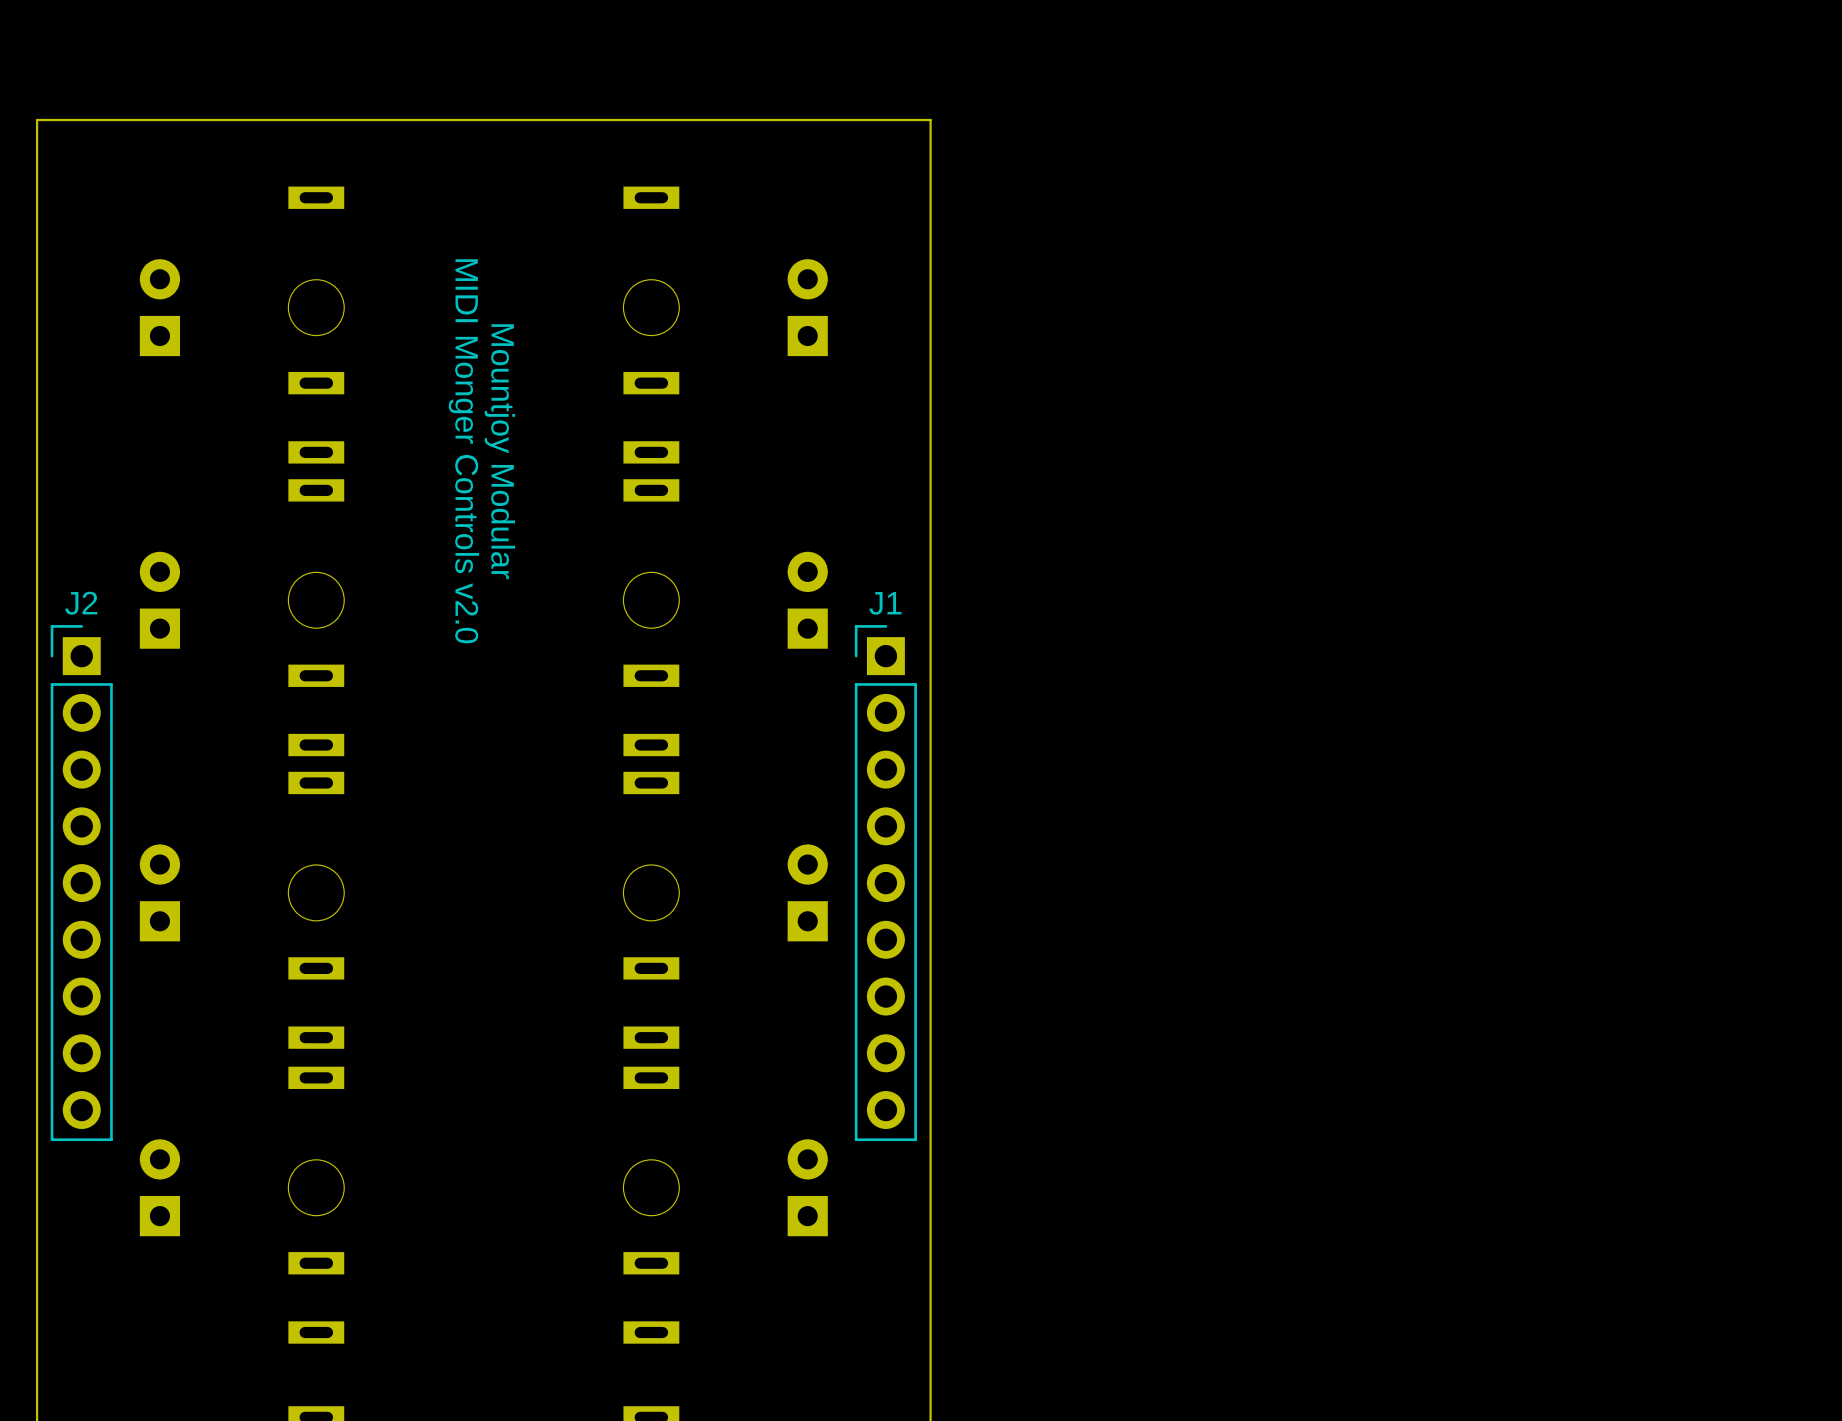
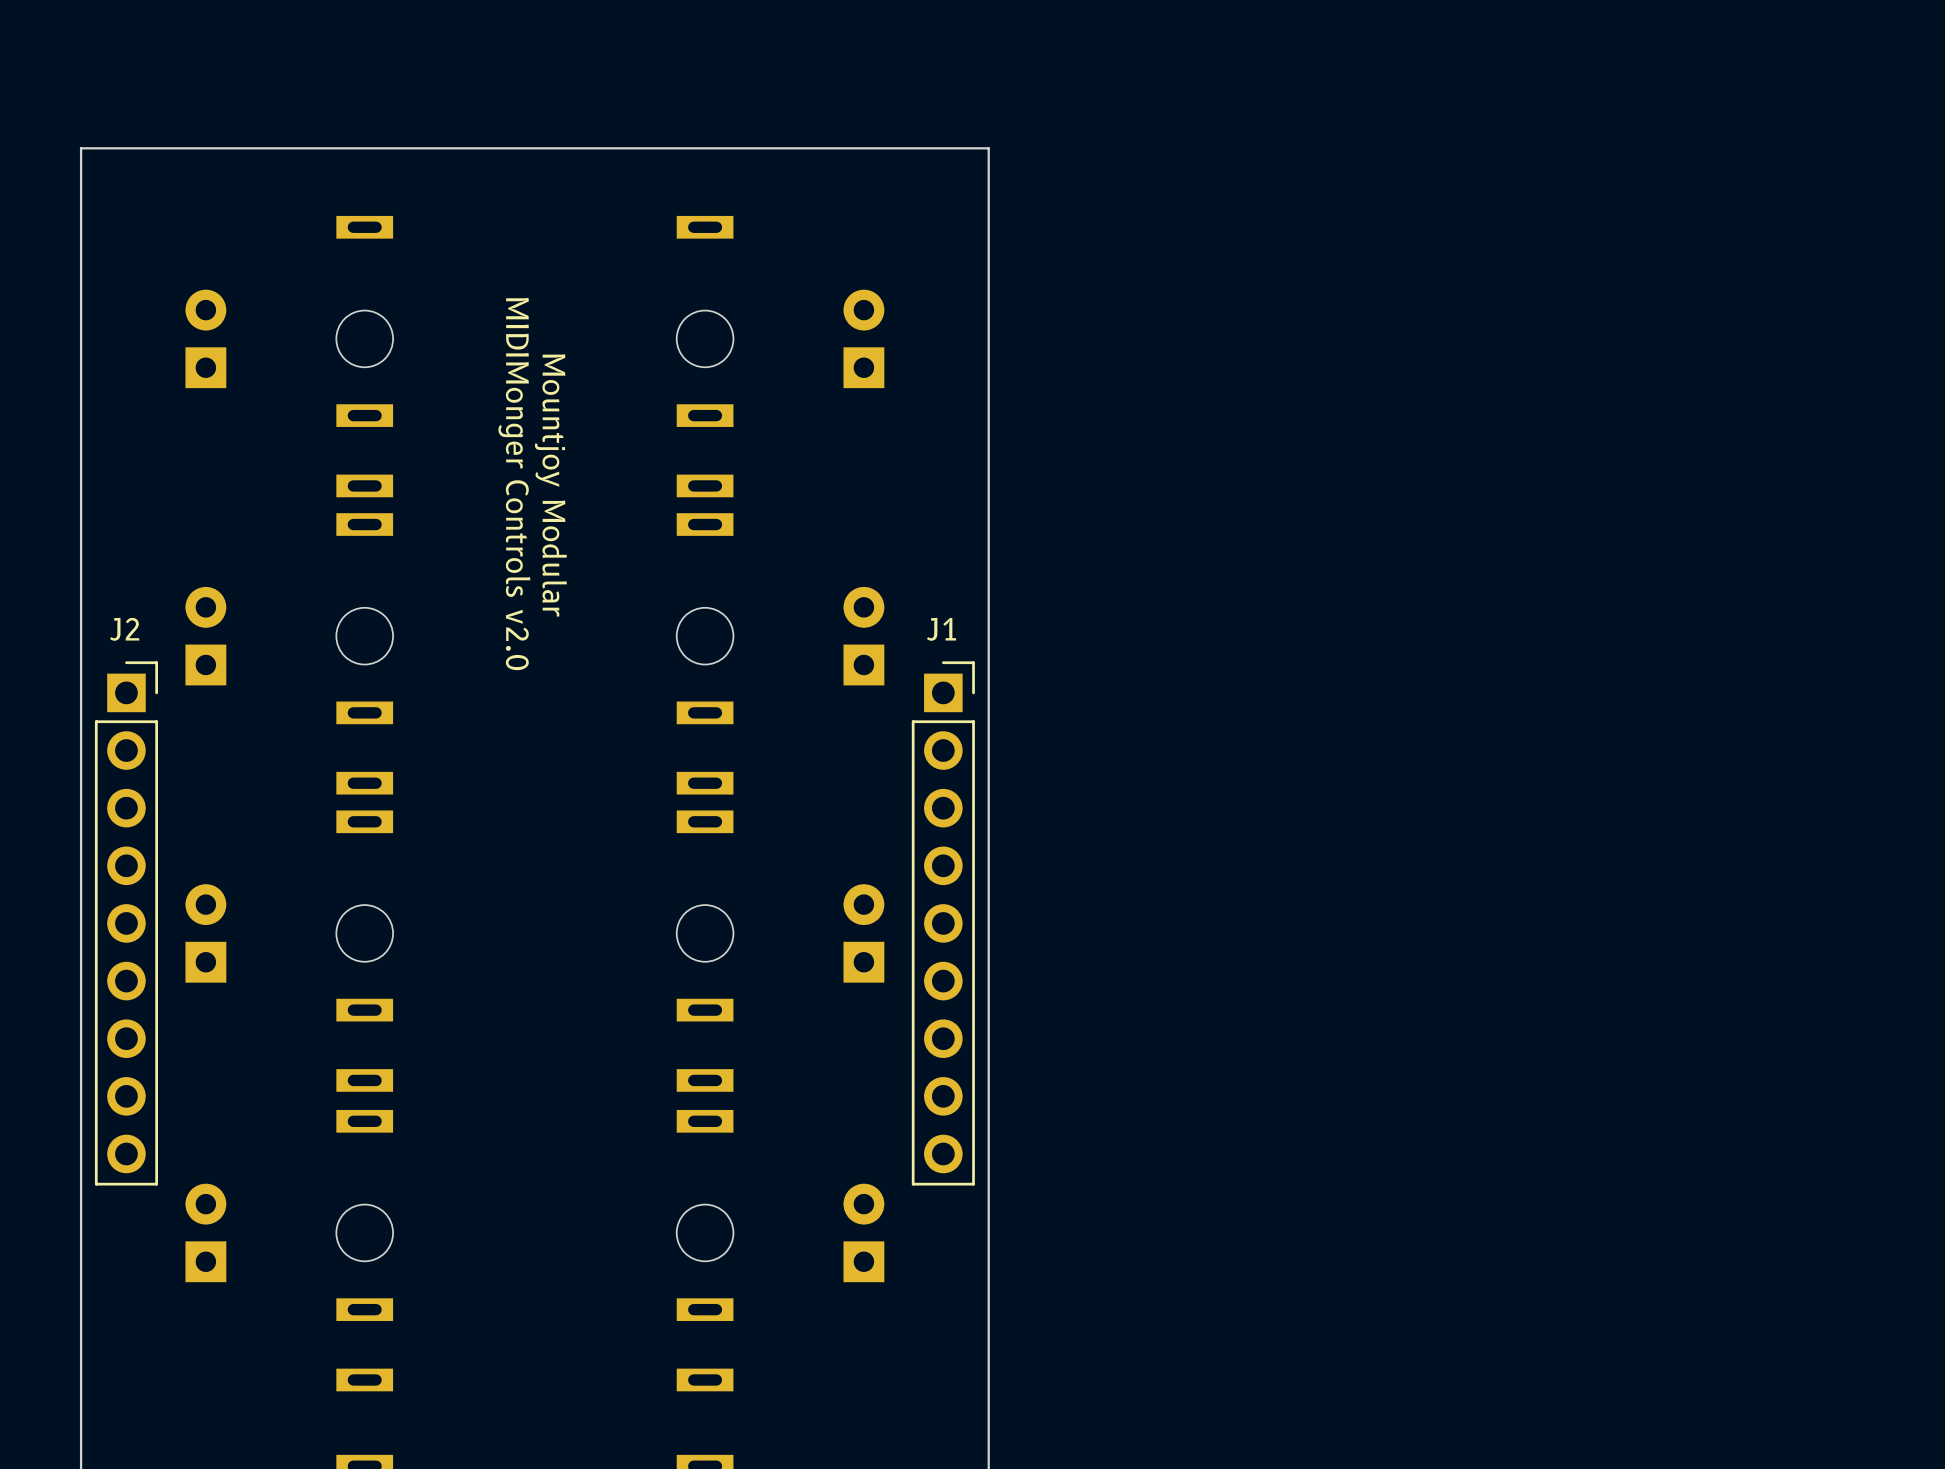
text: MIDI Monger Controls v2.0 (463, 451) -> MIDIMonger Controls v2.0 (514, 484)
J2 footprint: [50, 625, 113, 1142] -> [94, 661, 159, 1186]
J1 footprint: [854, 625, 917, 1142] -> [911, 661, 975, 1186]

